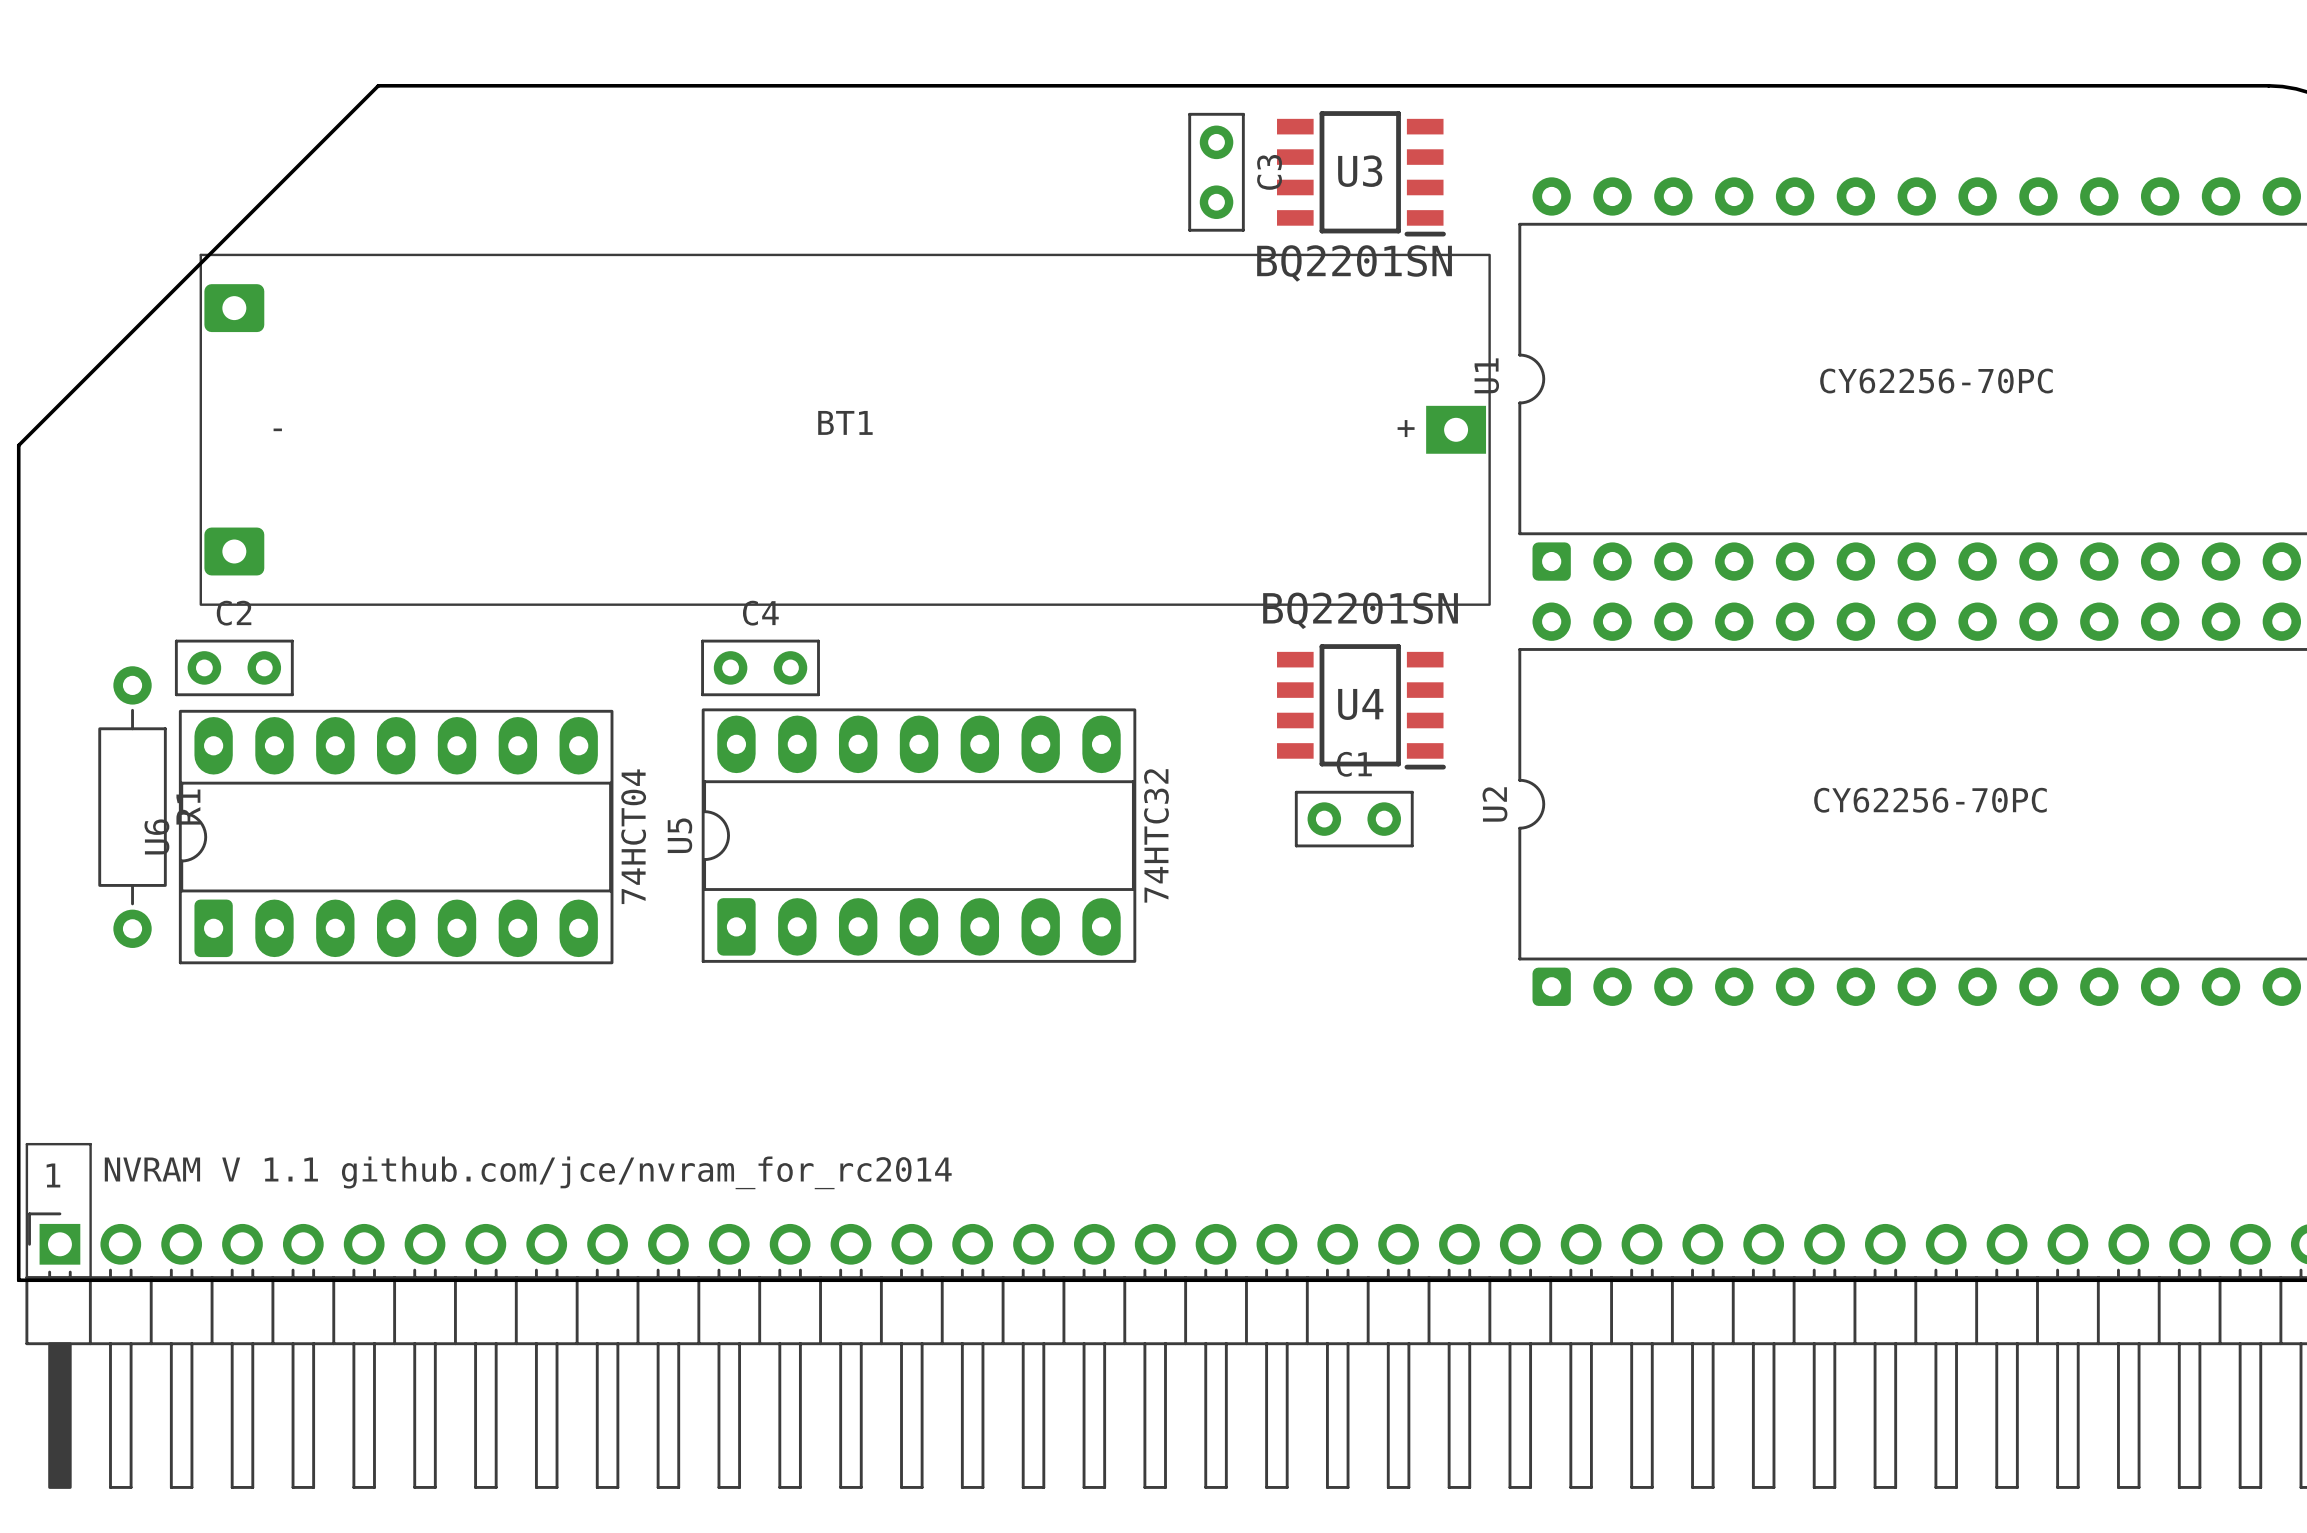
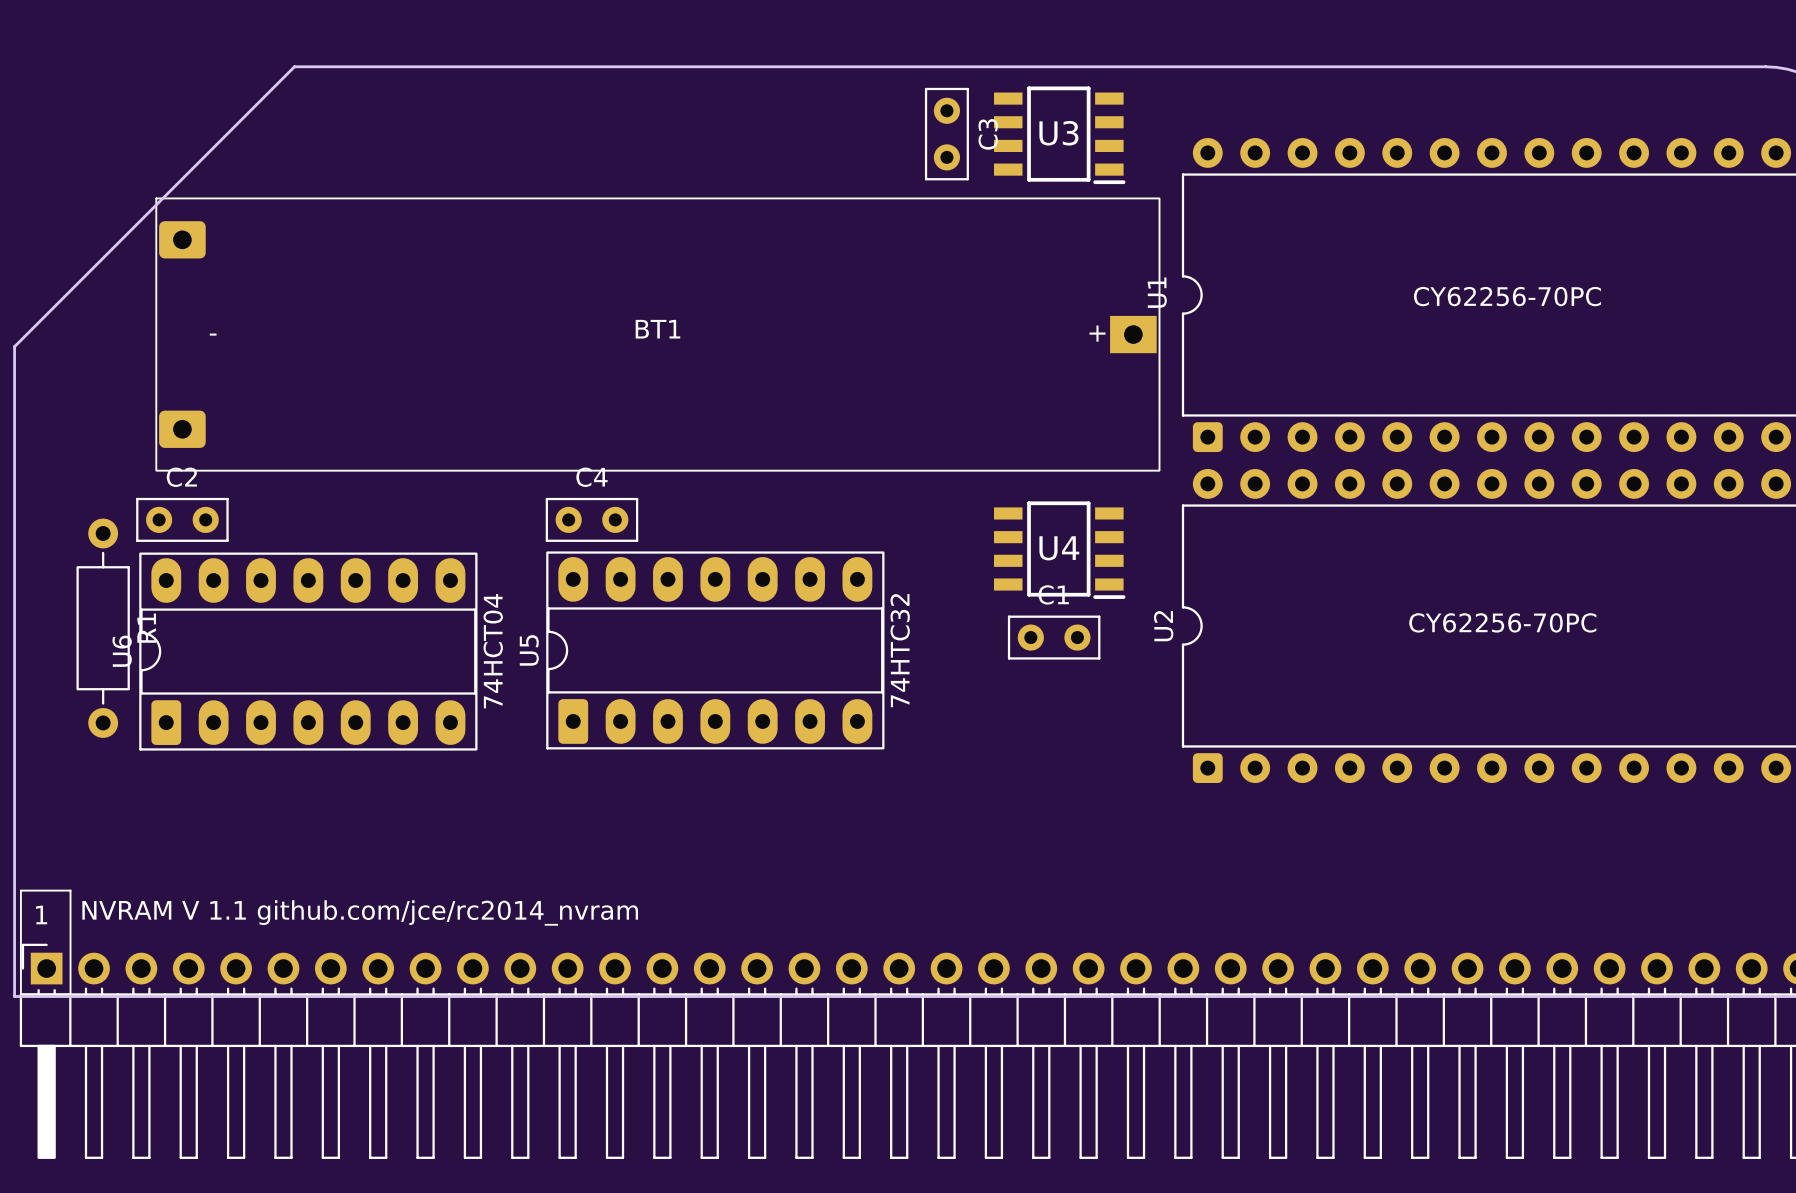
U3 value: BQ2201SN (1354, 263) -> none
U4 value: BQ2201SN (1360, 610) -> none
text: NVRAM V 1.1 github.com/jce/nvram_for_rc2014 (528, 1172) -> NVRAM V 1.1 github.com/jce/rc2014_nvram (360, 912)

